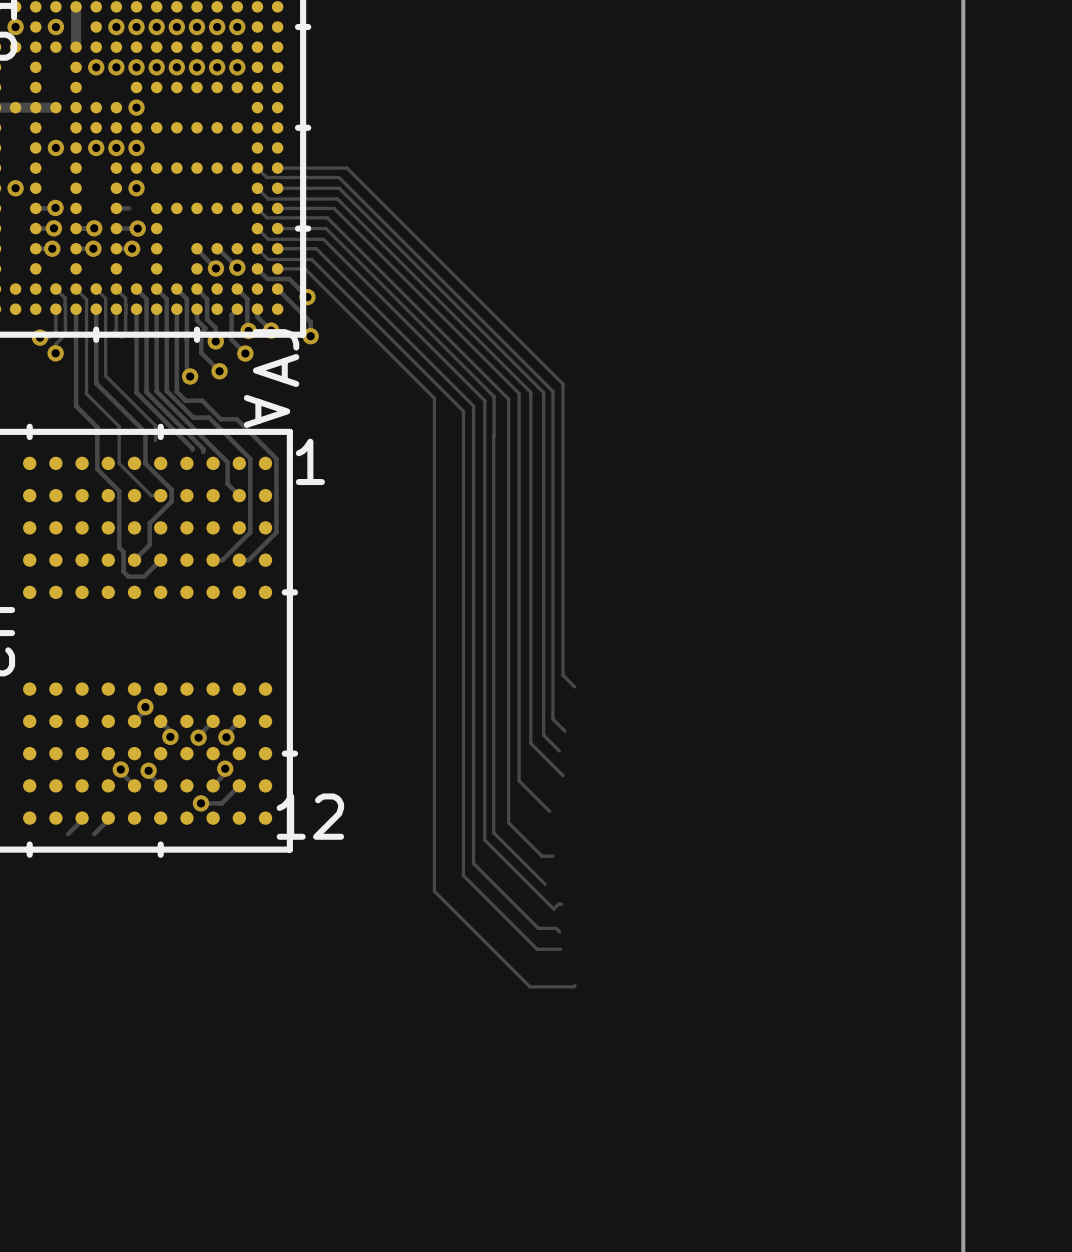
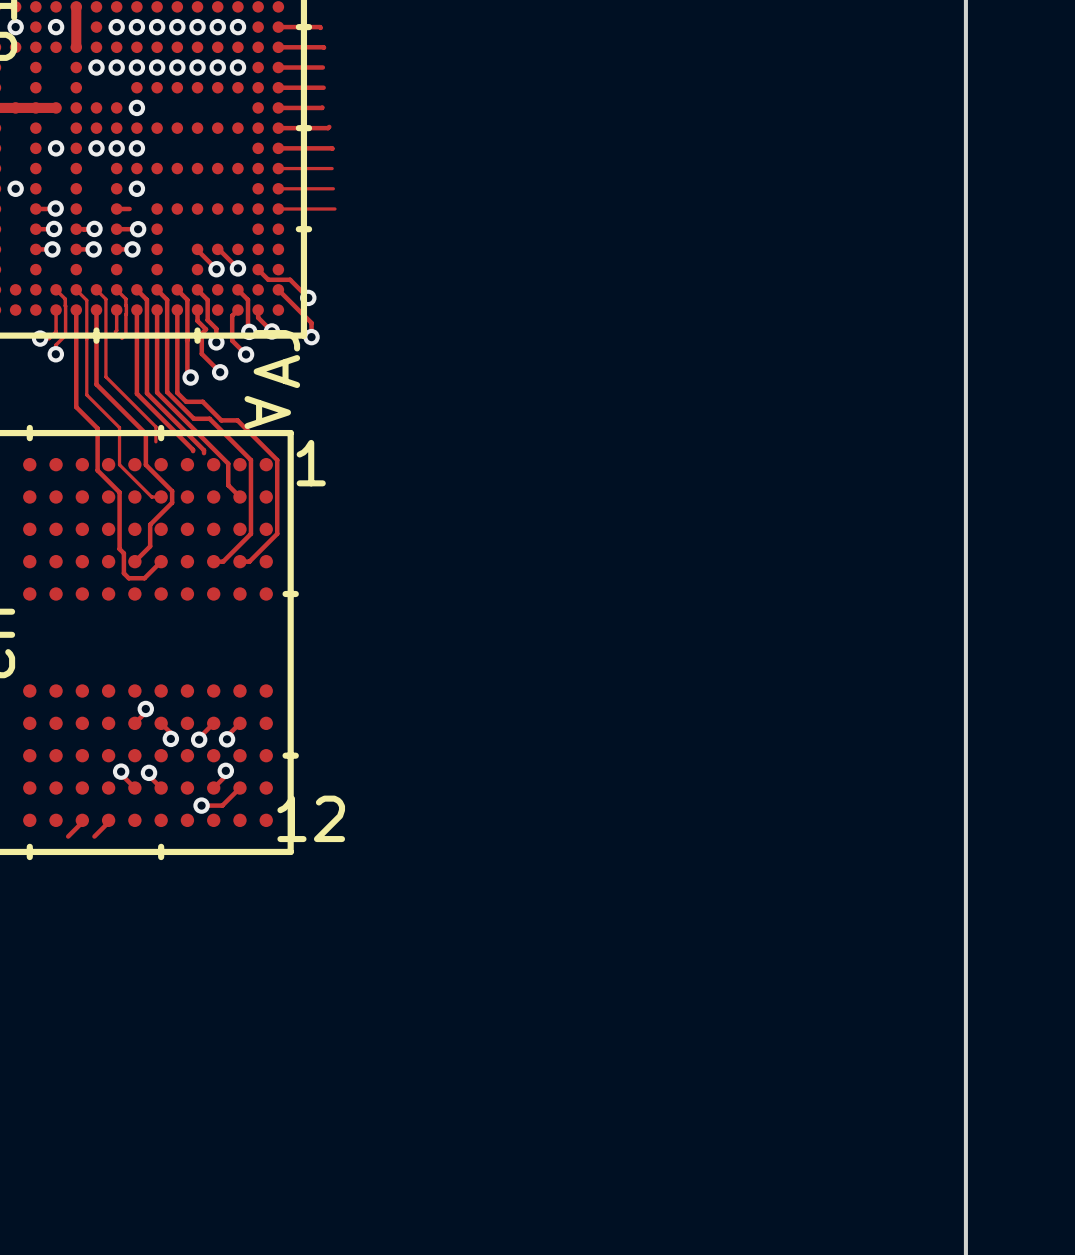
track: none -> (278, 27) (320, 27)
track: none -> (278, 47) (323, 47)
track: none -> (278, 67) (322, 67)
track: none -> (278, 87) (323, 87)
track: none -> (278, 107) (322, 107)
track: none -> (329, 126) (278, 128)
track: none -> (278, 148) (332, 148)
track: (257, 168) (266, 177) (339, 177) (552, 391) (552, 719) (565, 731) -> none
track: (331, 168) (346, 168) (563, 384) (563, 675) (574, 686) -> none
track: (257, 188) (268, 199) (337, 199) (530, 392) (530, 743) (563, 775) -> none
track: (332, 188) (339, 188) (543, 392) (543, 735) (559, 751) -> none
track: (257, 208) (266, 217) (327, 217) (508, 399) (508, 822) (542, 856) (552, 856) -> none
track: (334, 208) (519, 393) (519, 780) (549, 811) -> none
track: (257, 228) (268, 239) (323, 239) (484, 400) (484, 840) (553, 909) (558, 904) (561, 904) -> none
track: (277, 228) (325, 228) (494, 396) (494, 435) -> none
track: (257, 248) (268, 259) (311, 259) (463, 411) (463, 875) (537, 949) (560, 949) -> none
track: (277, 248) (316, 248) (473, 405) (473, 863) (538, 928) (556, 928) (559, 931) -> none
track: (277, 268) (305, 268) (434, 398) (434, 891) (529, 986) (575, 985) -> none
track: (493, 436) (493, 832) (545, 884) -> none

